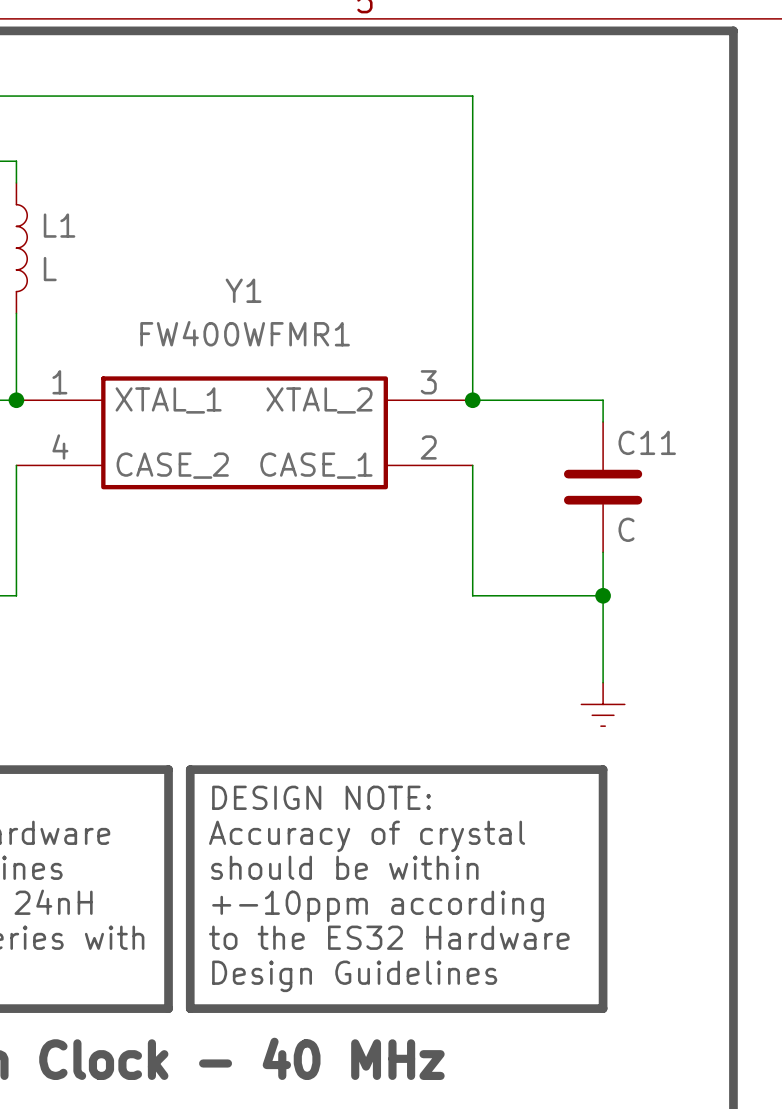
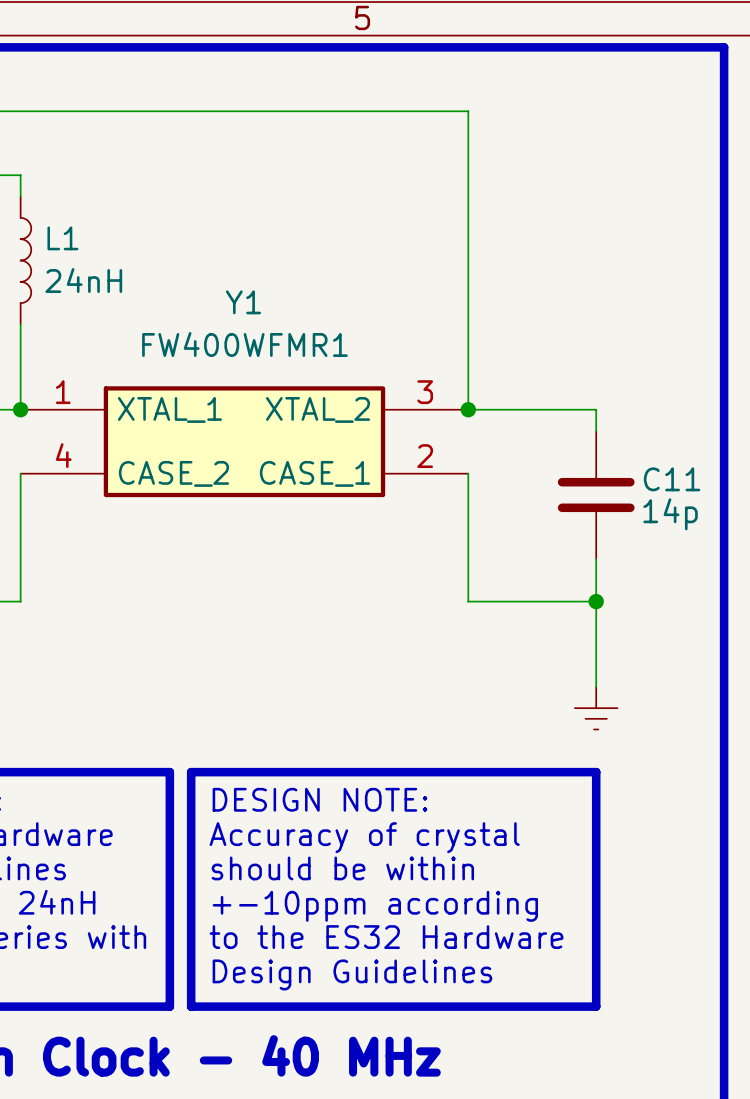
L1 value: L (50, 269) -> 24nH (83, 280)
C11 name position: C11 (647, 442) -> C11 (672, 479)
C11 value: C (626, 529) -> 14p (670, 514)

